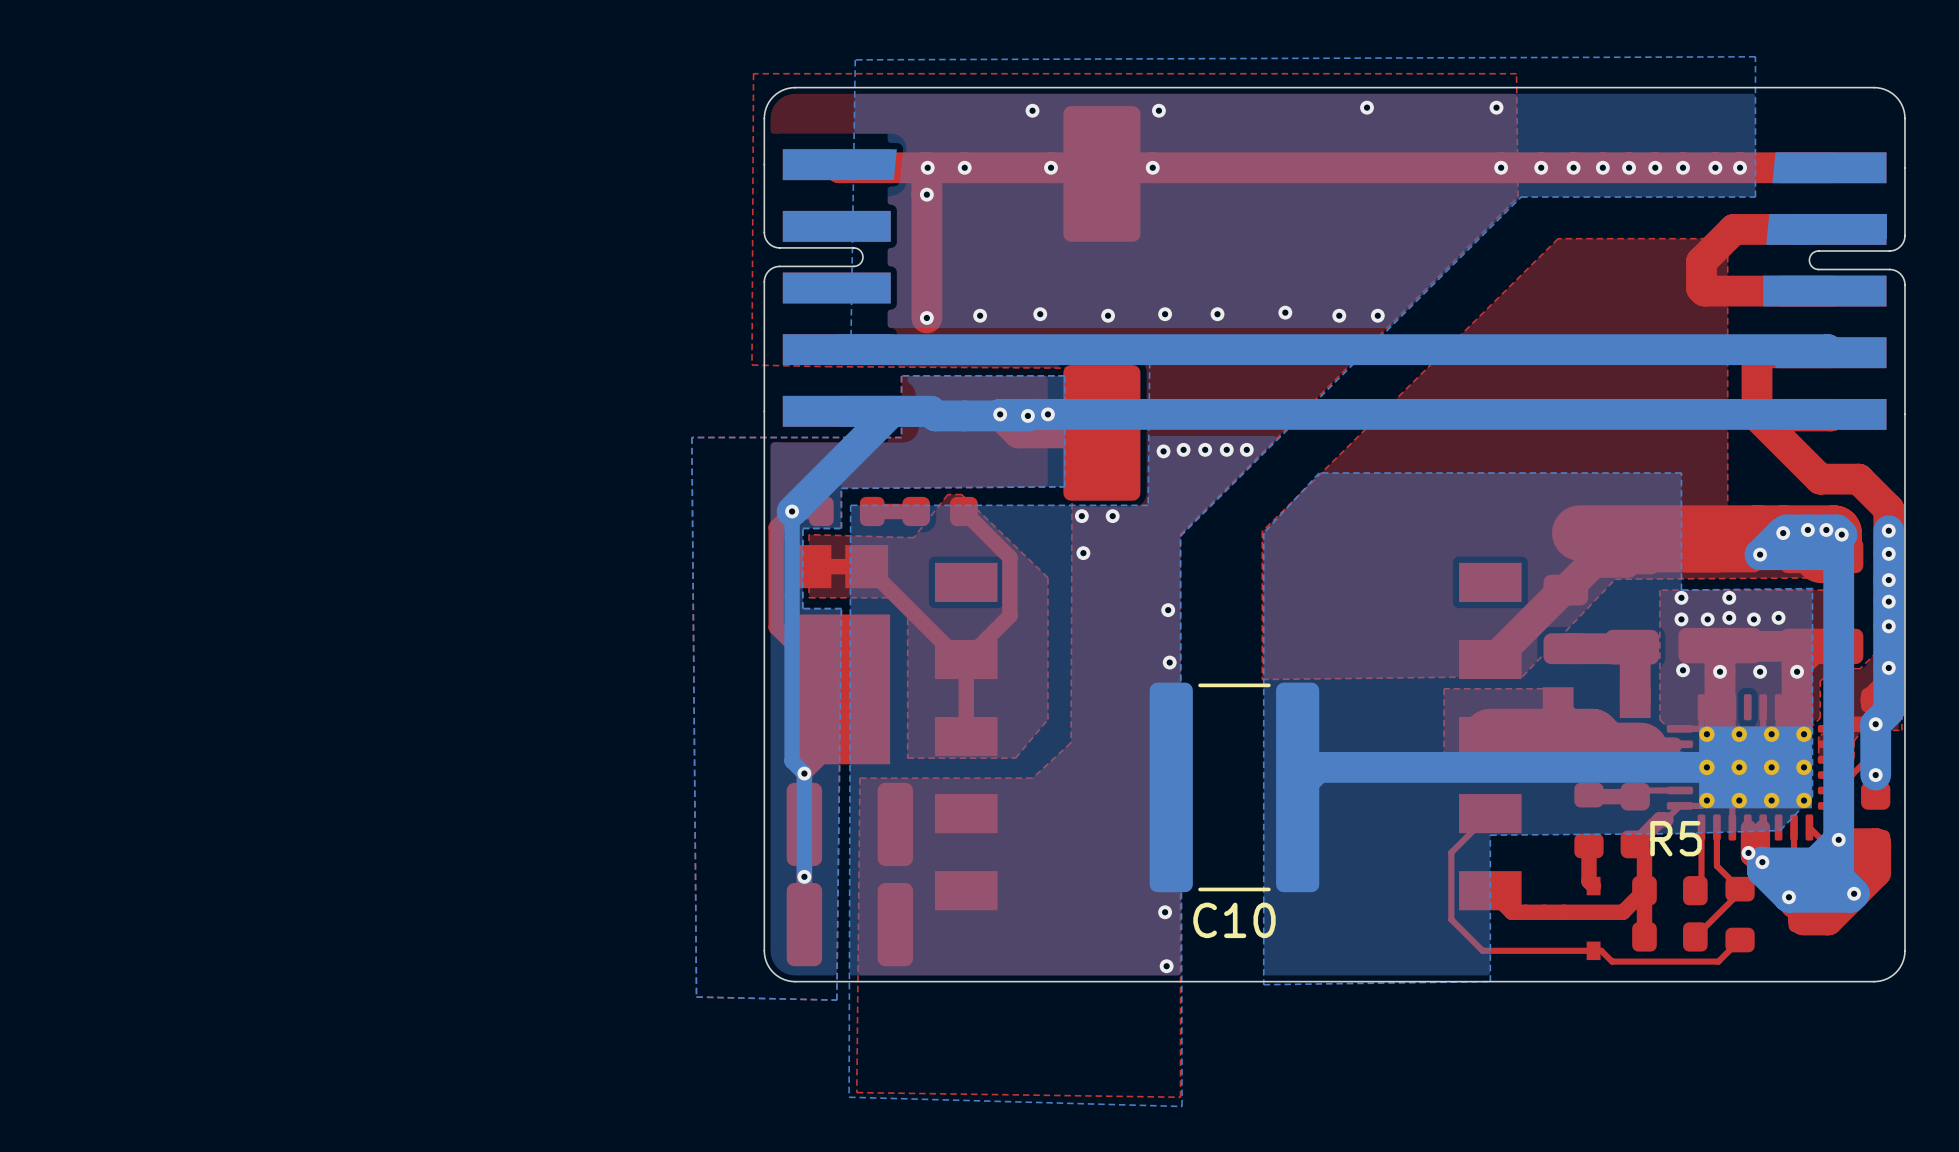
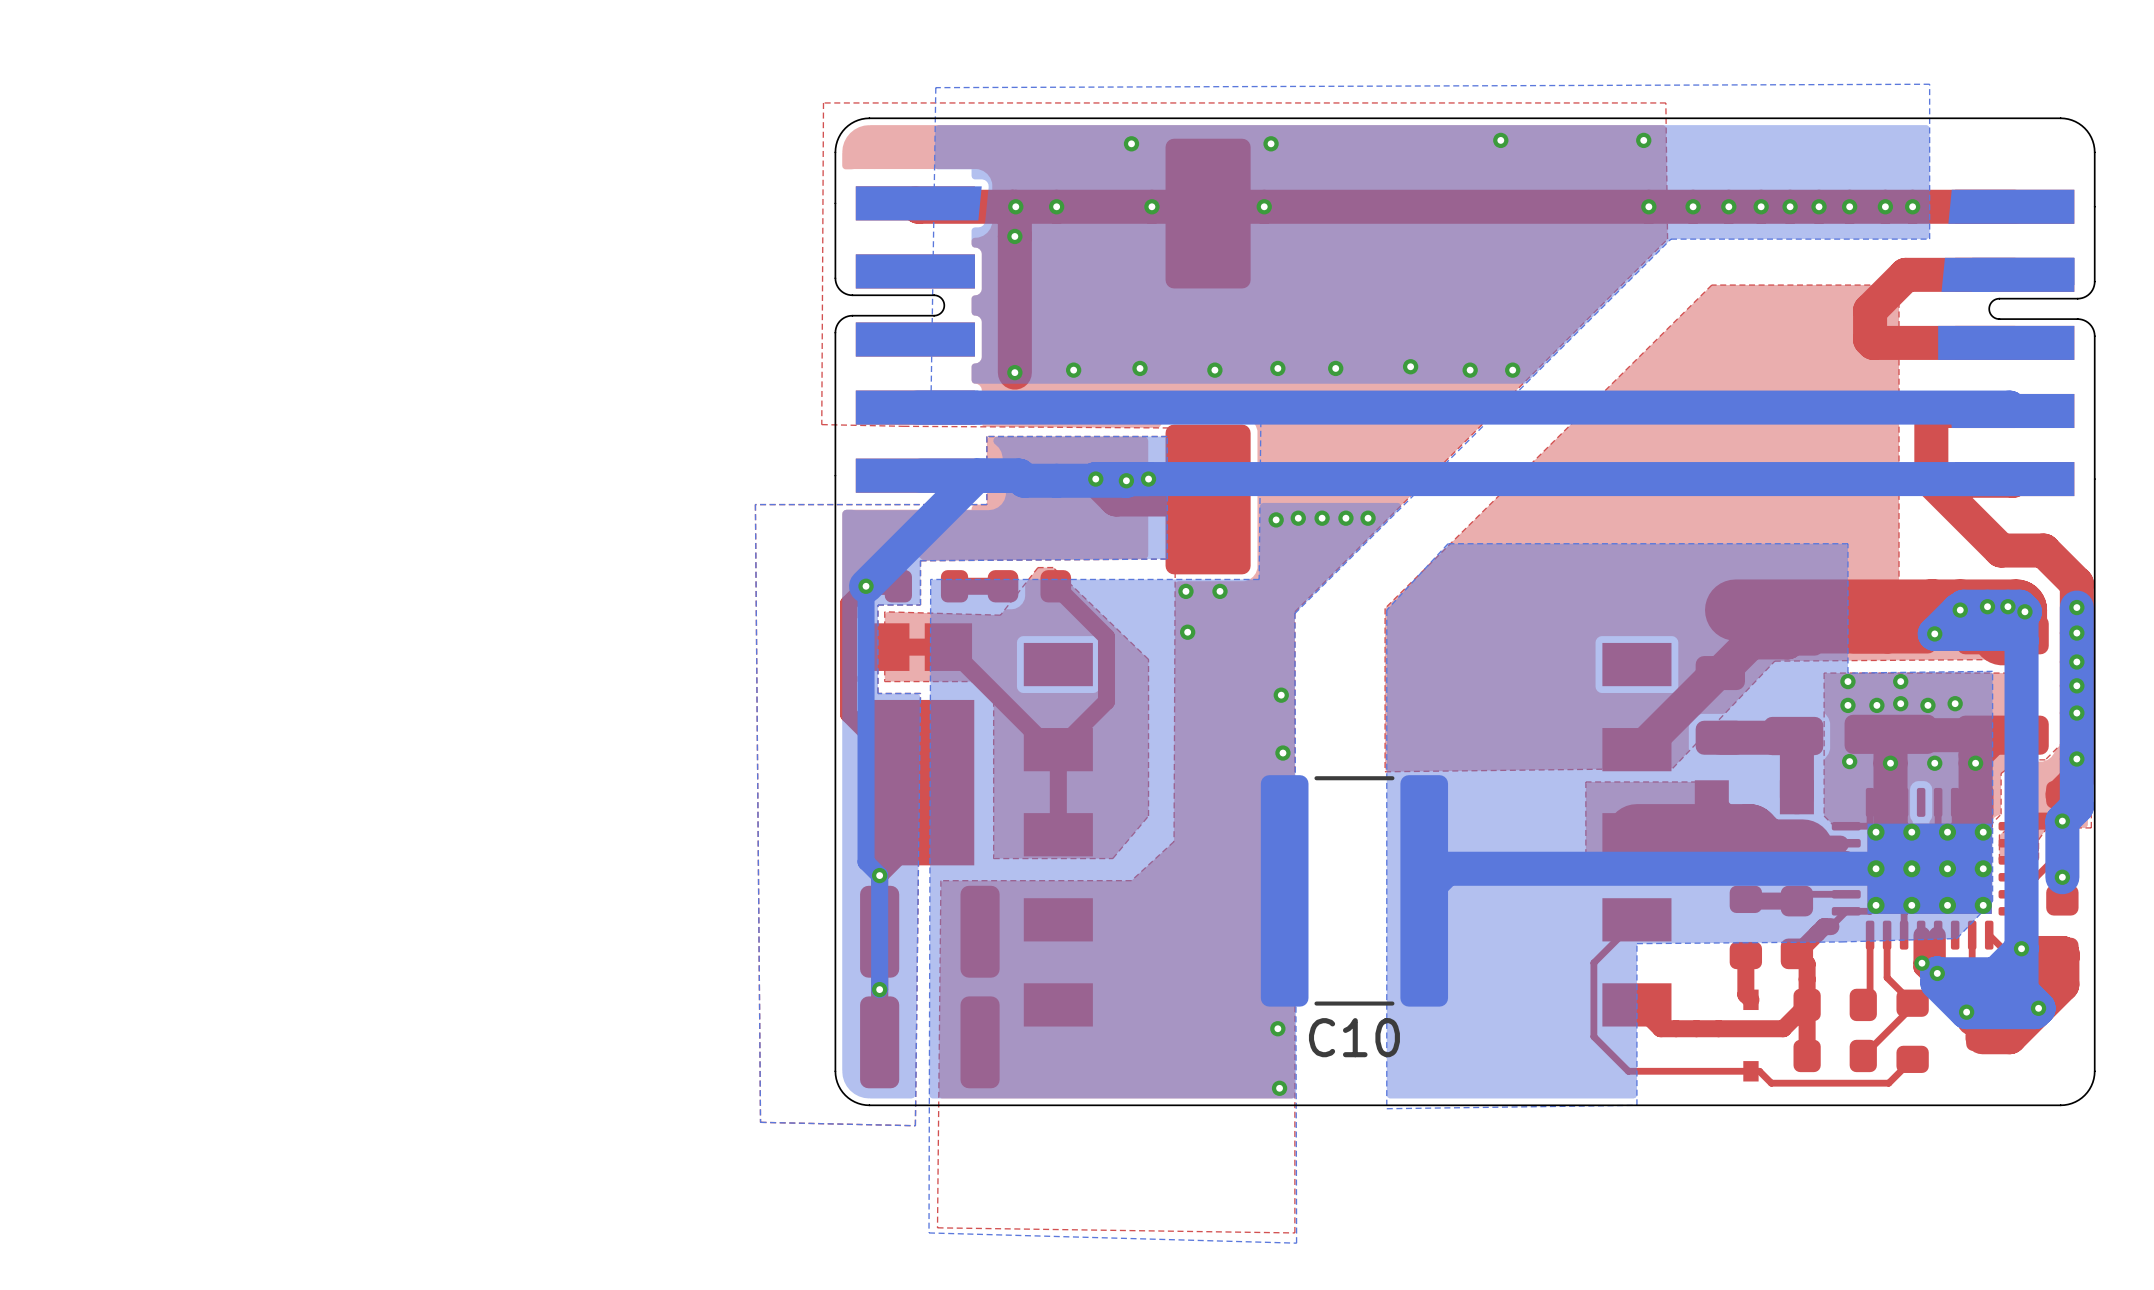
R5 name: R5 (1676, 838) -> none

